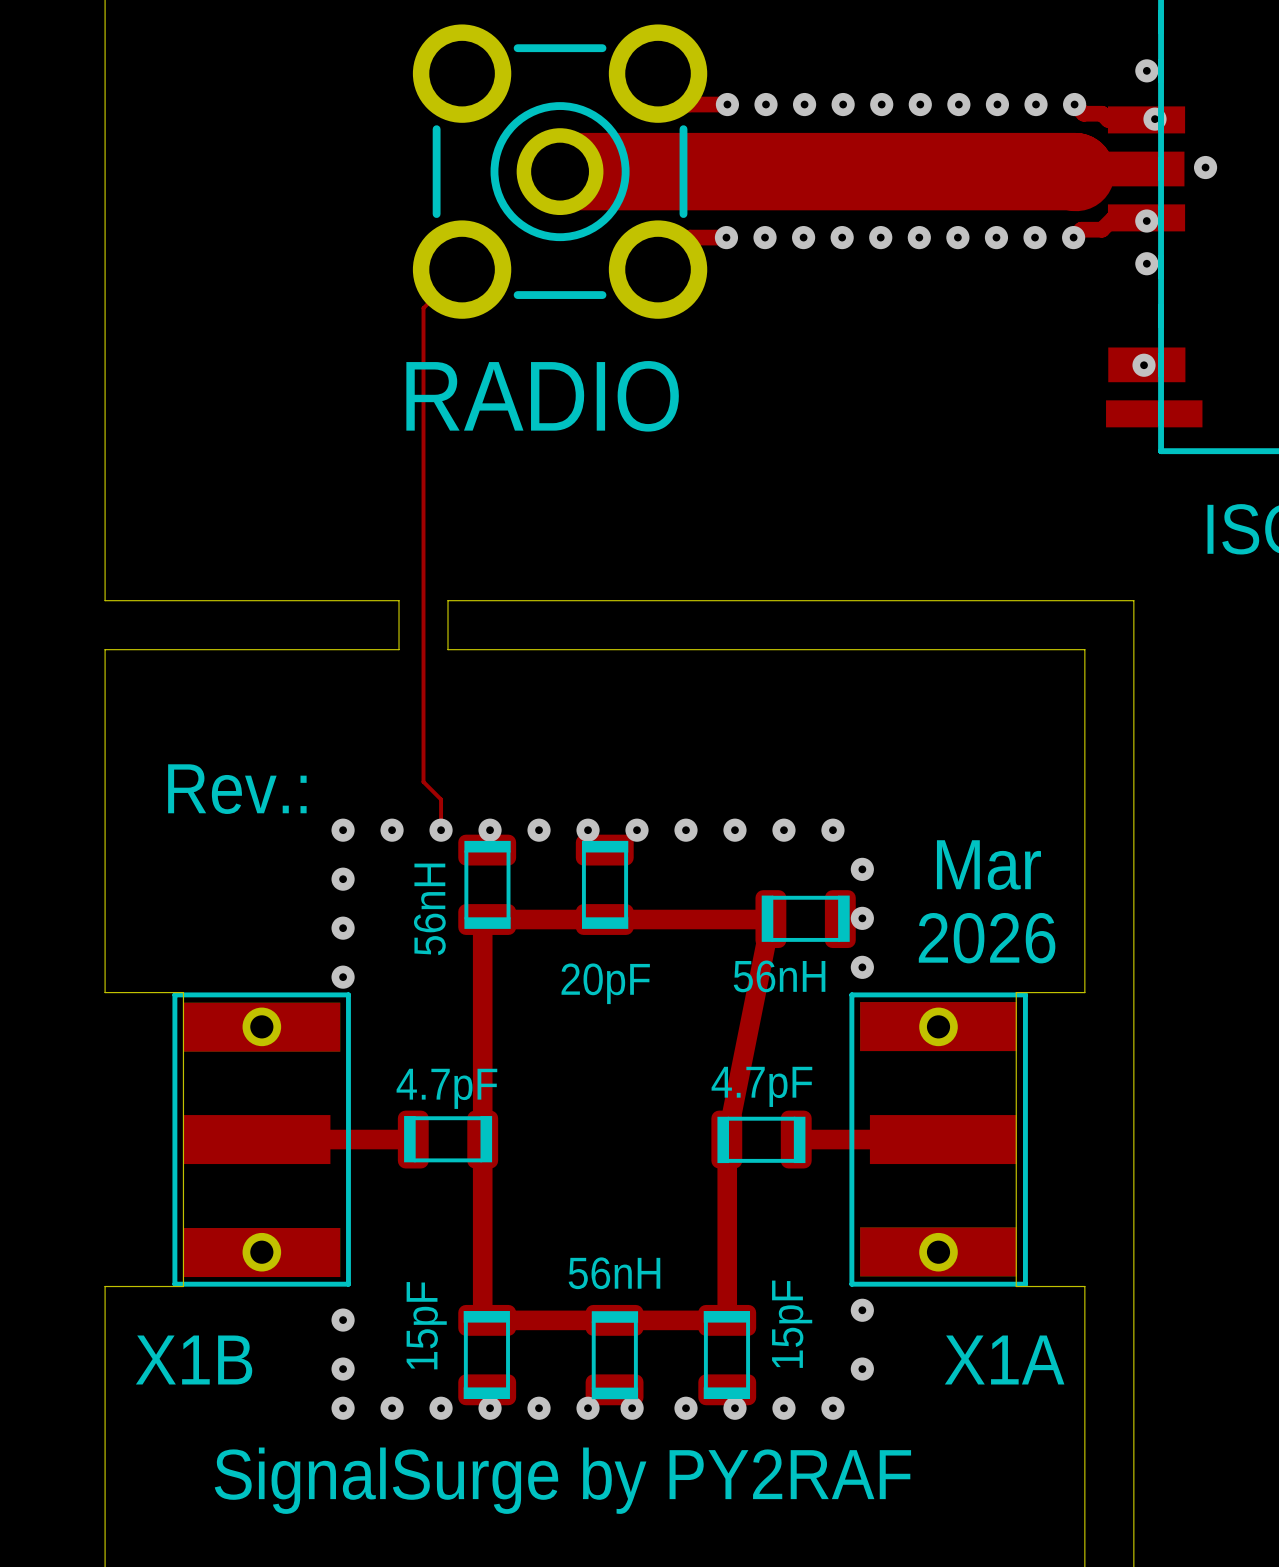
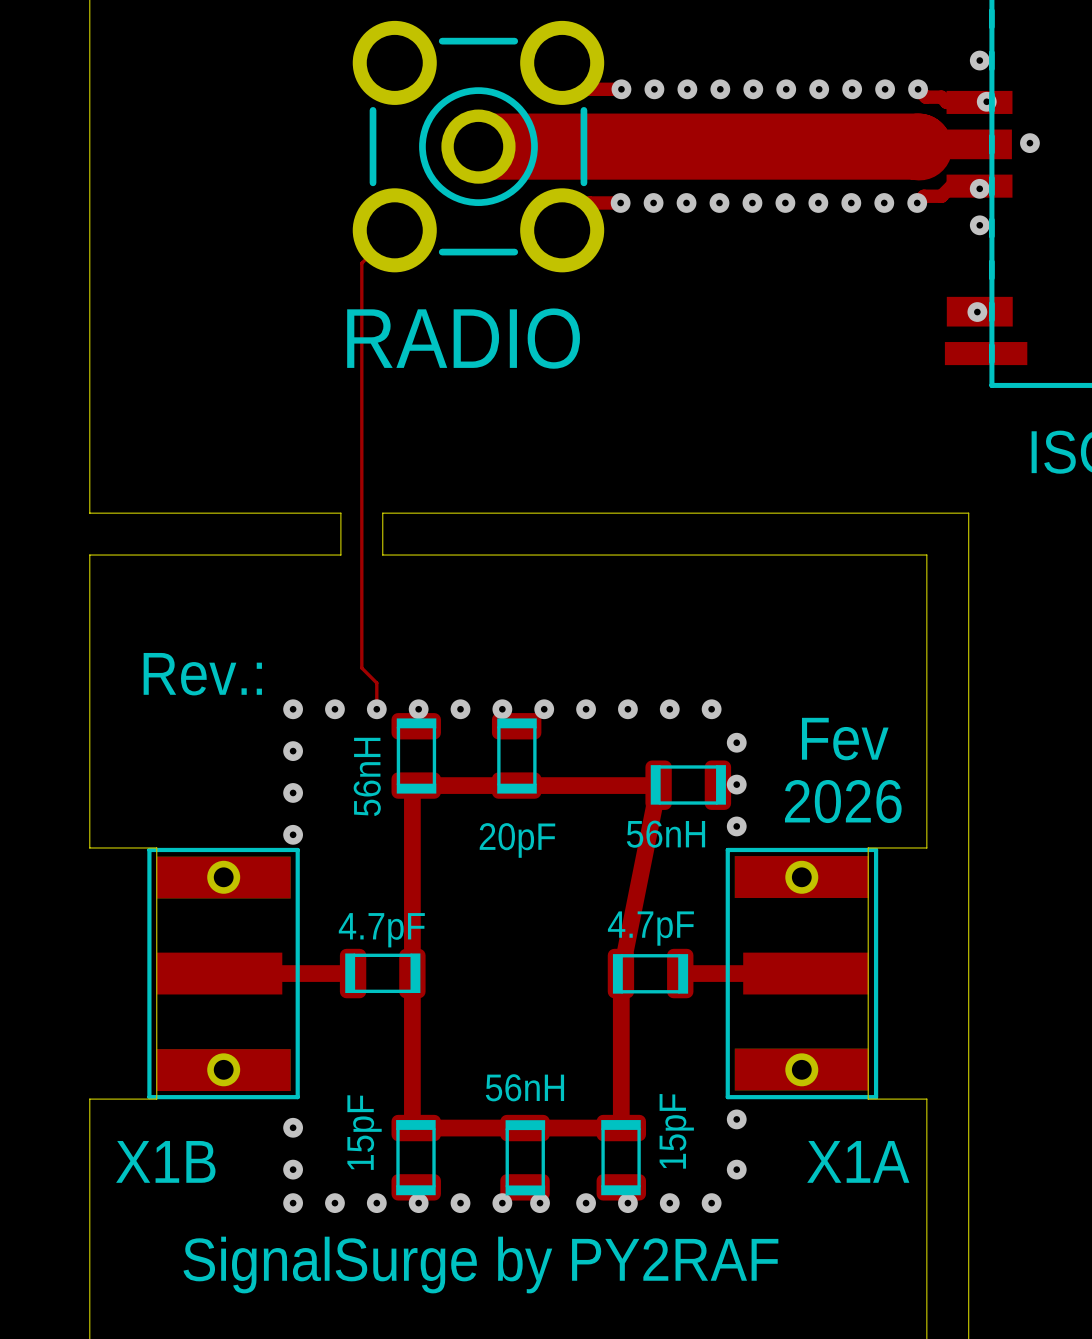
text: Mar (988, 865) -> Fev (845, 739)

